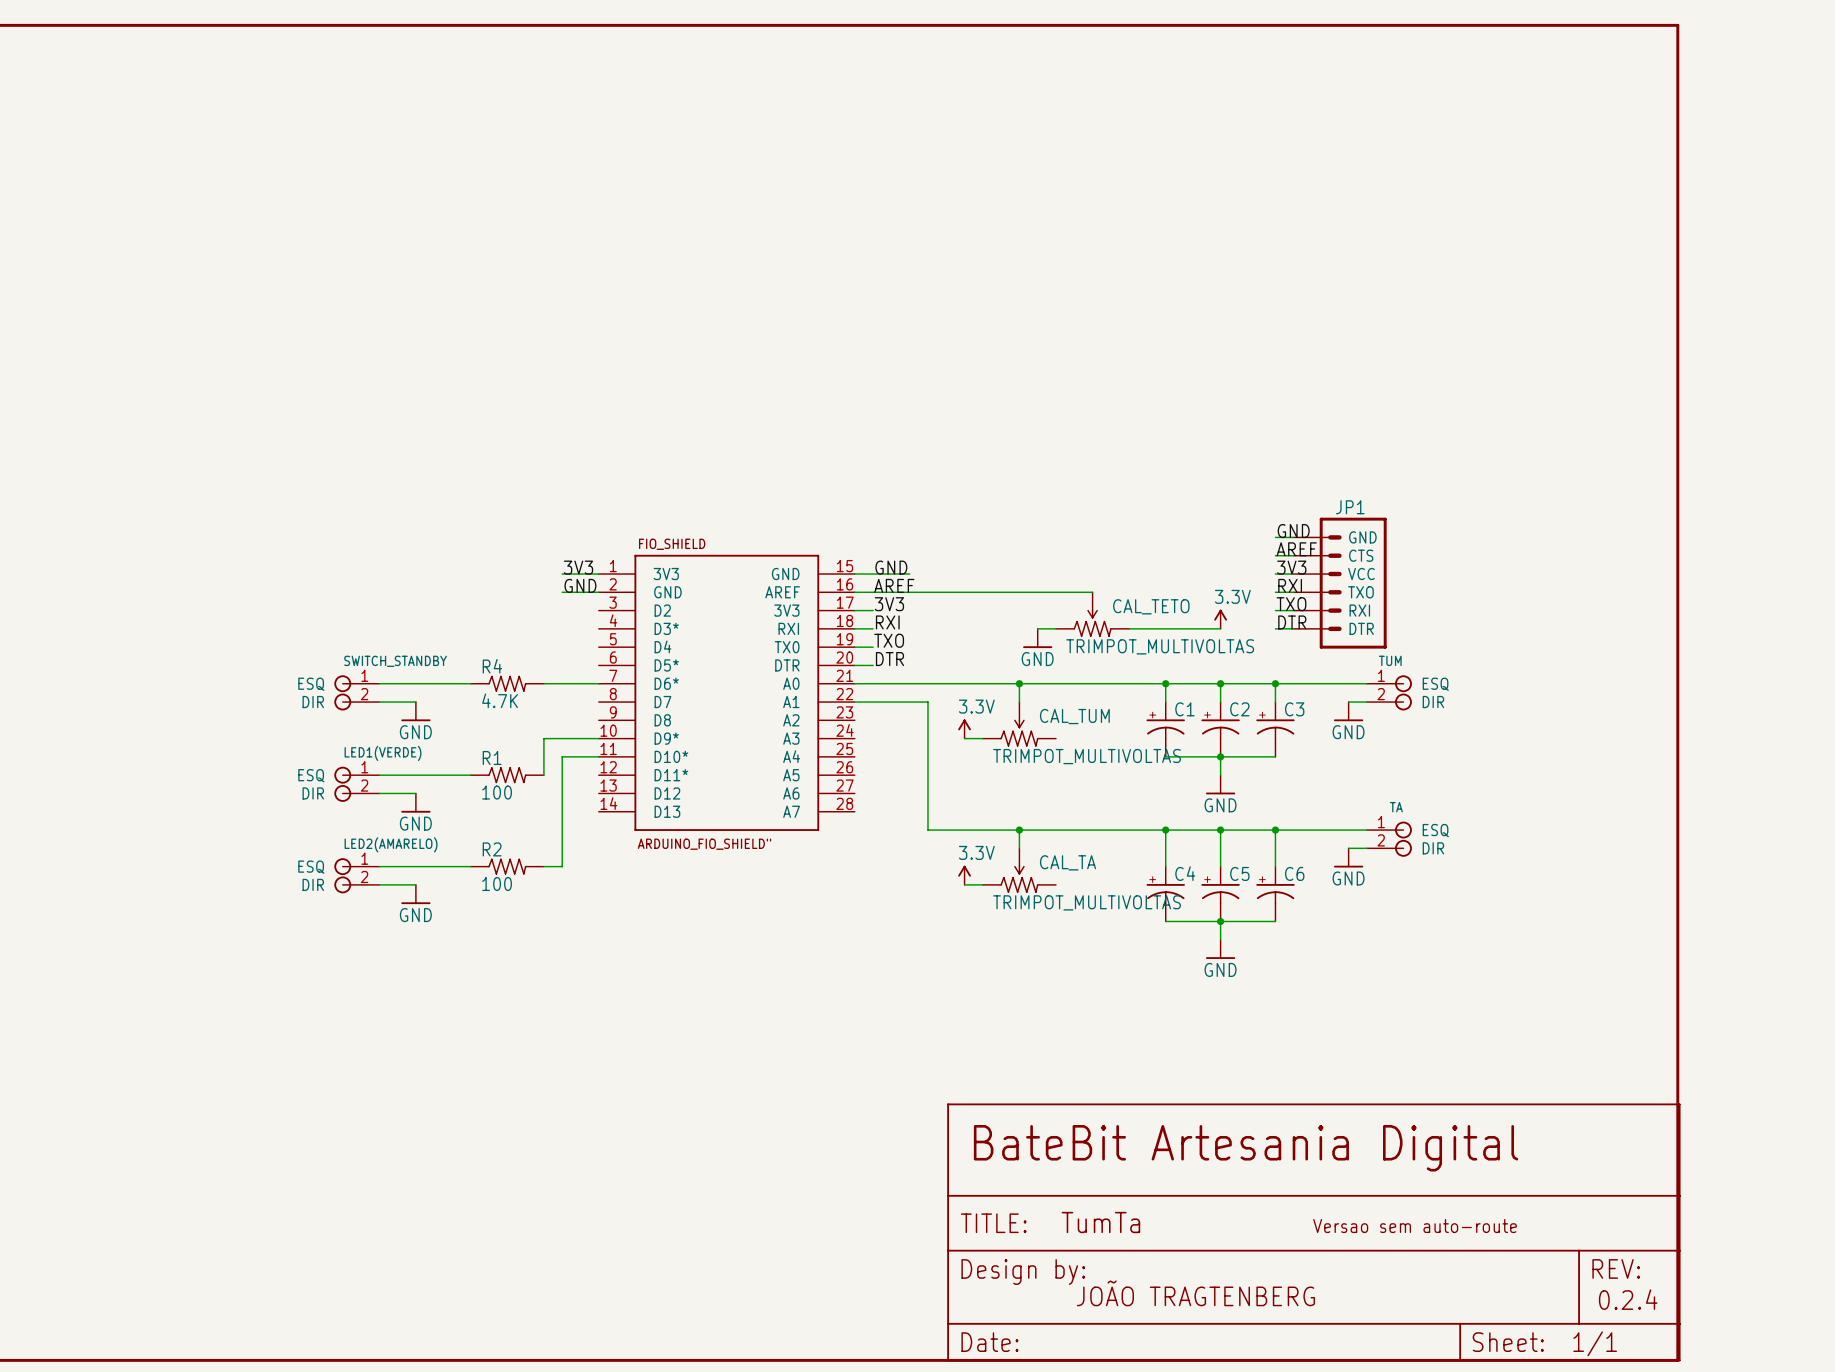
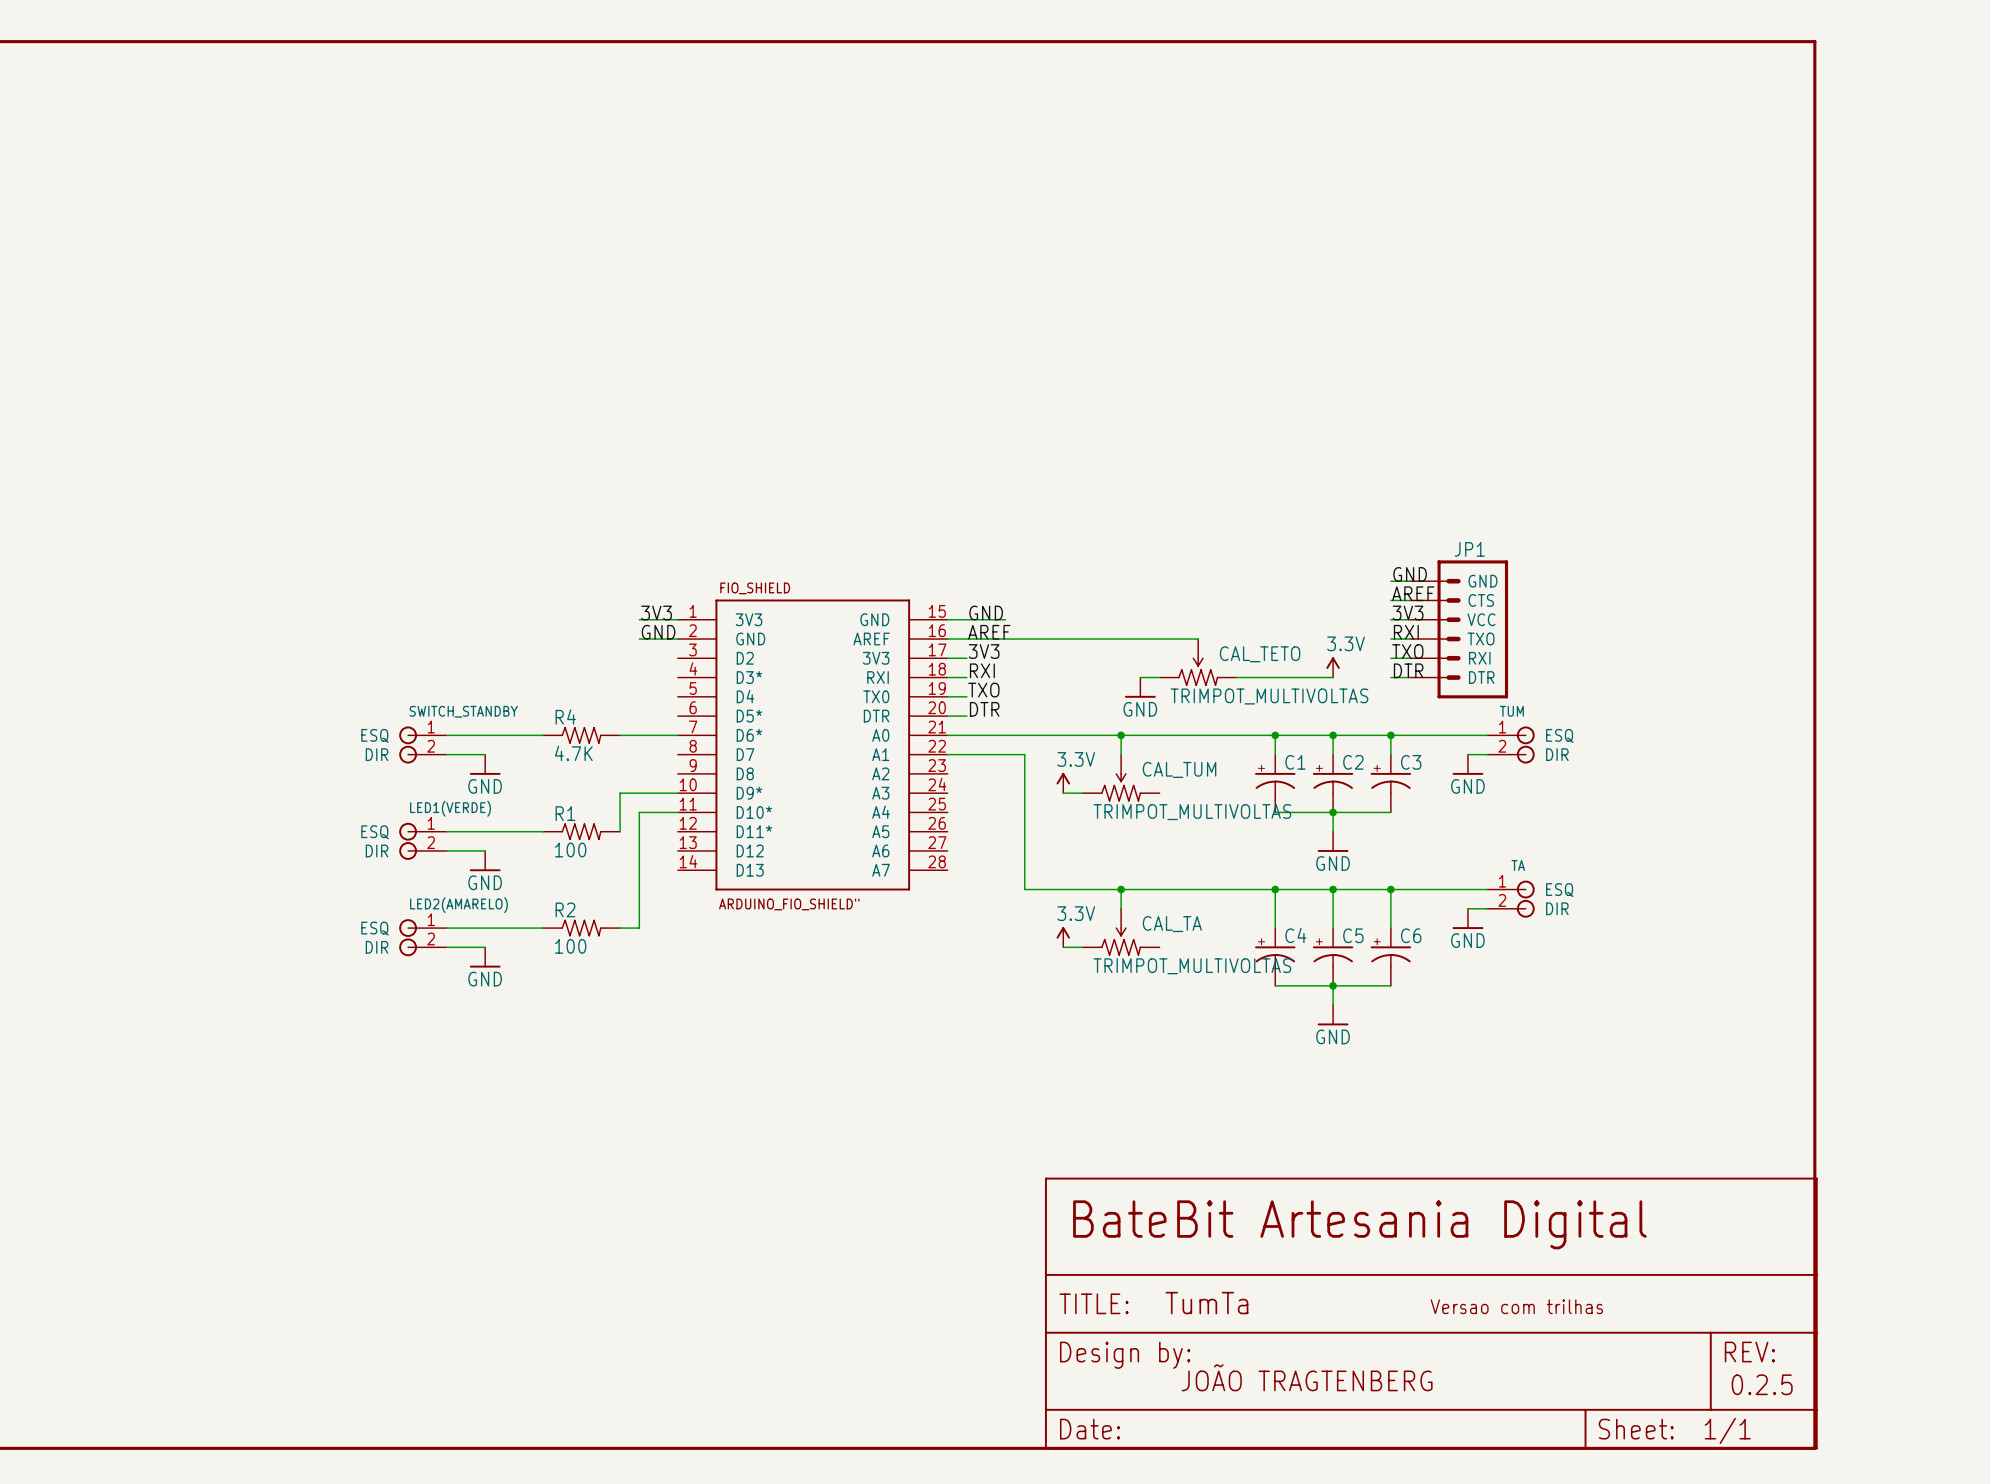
text: Versao sem auto-route (1415, 1225) -> Versao com trilhas (1516, 1306)
text: 0.2.4 (1628, 1299) -> 0.2.5 (1762, 1384)

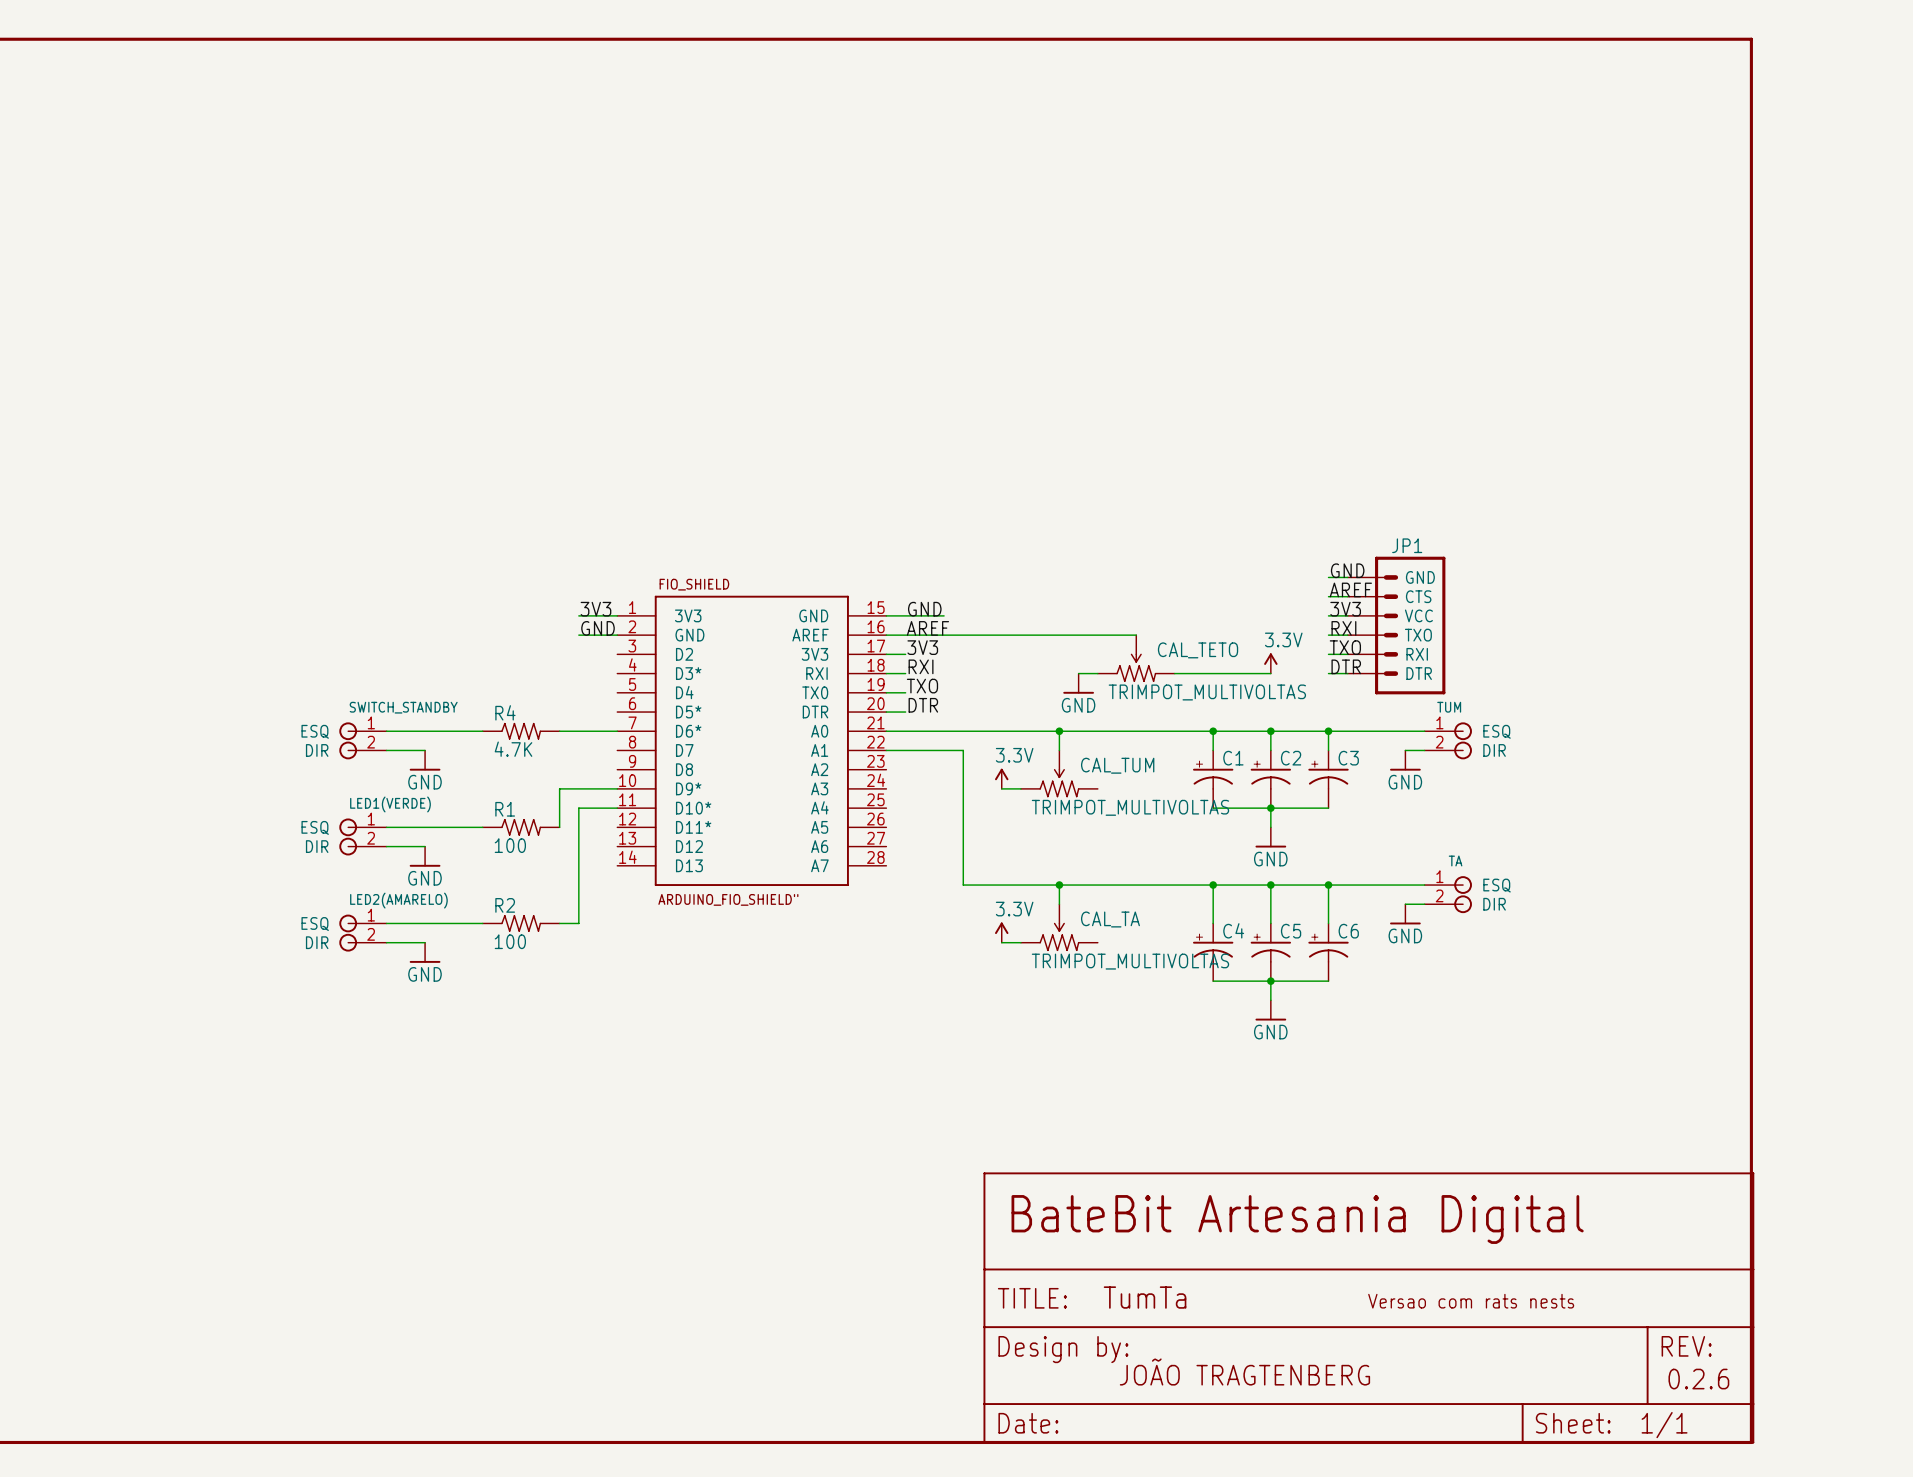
text: Versao com trilhas (1516, 1306) -> Versao com rats nests (1471, 1301)
text: 0.2.5 (1762, 1384) -> 0.2.6 (1698, 1379)

